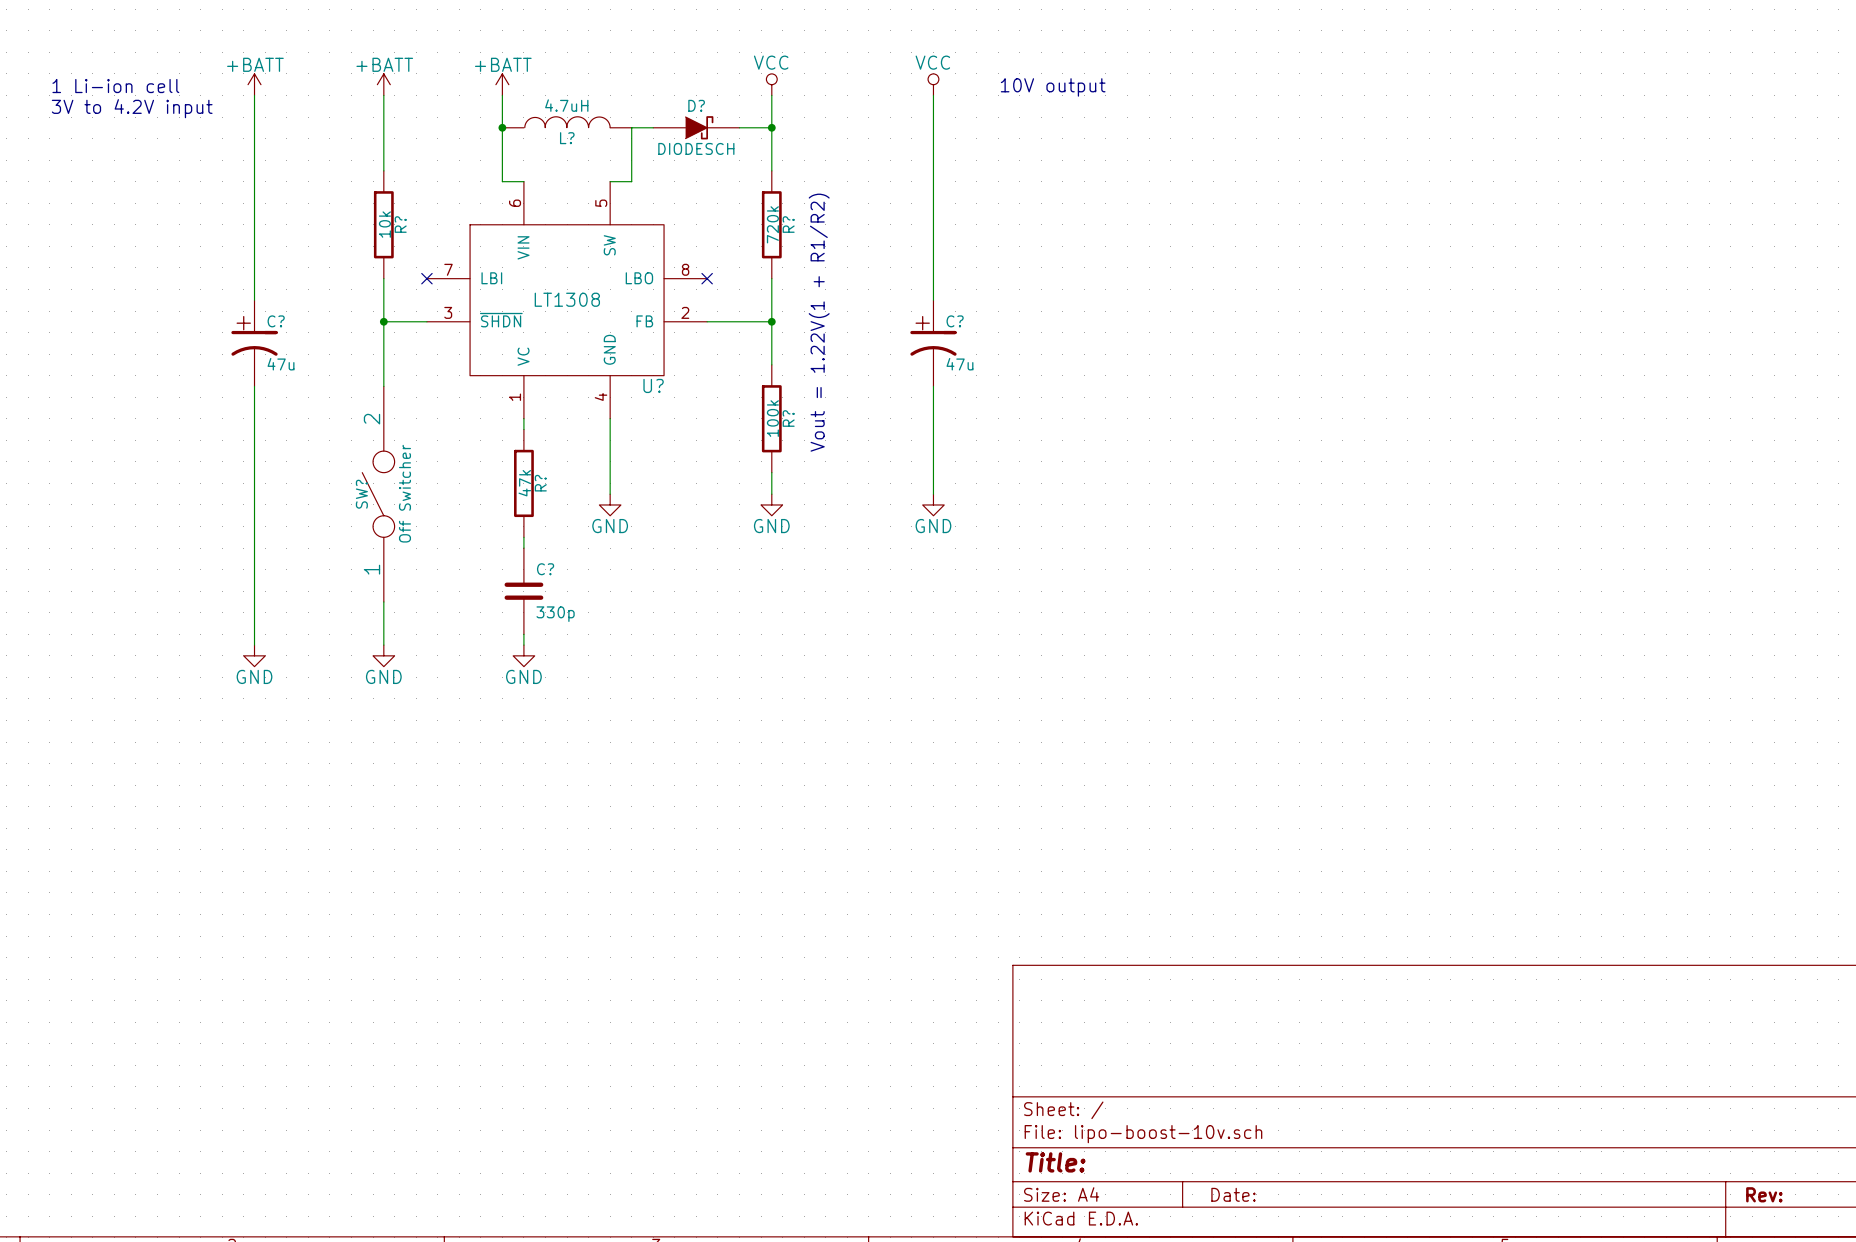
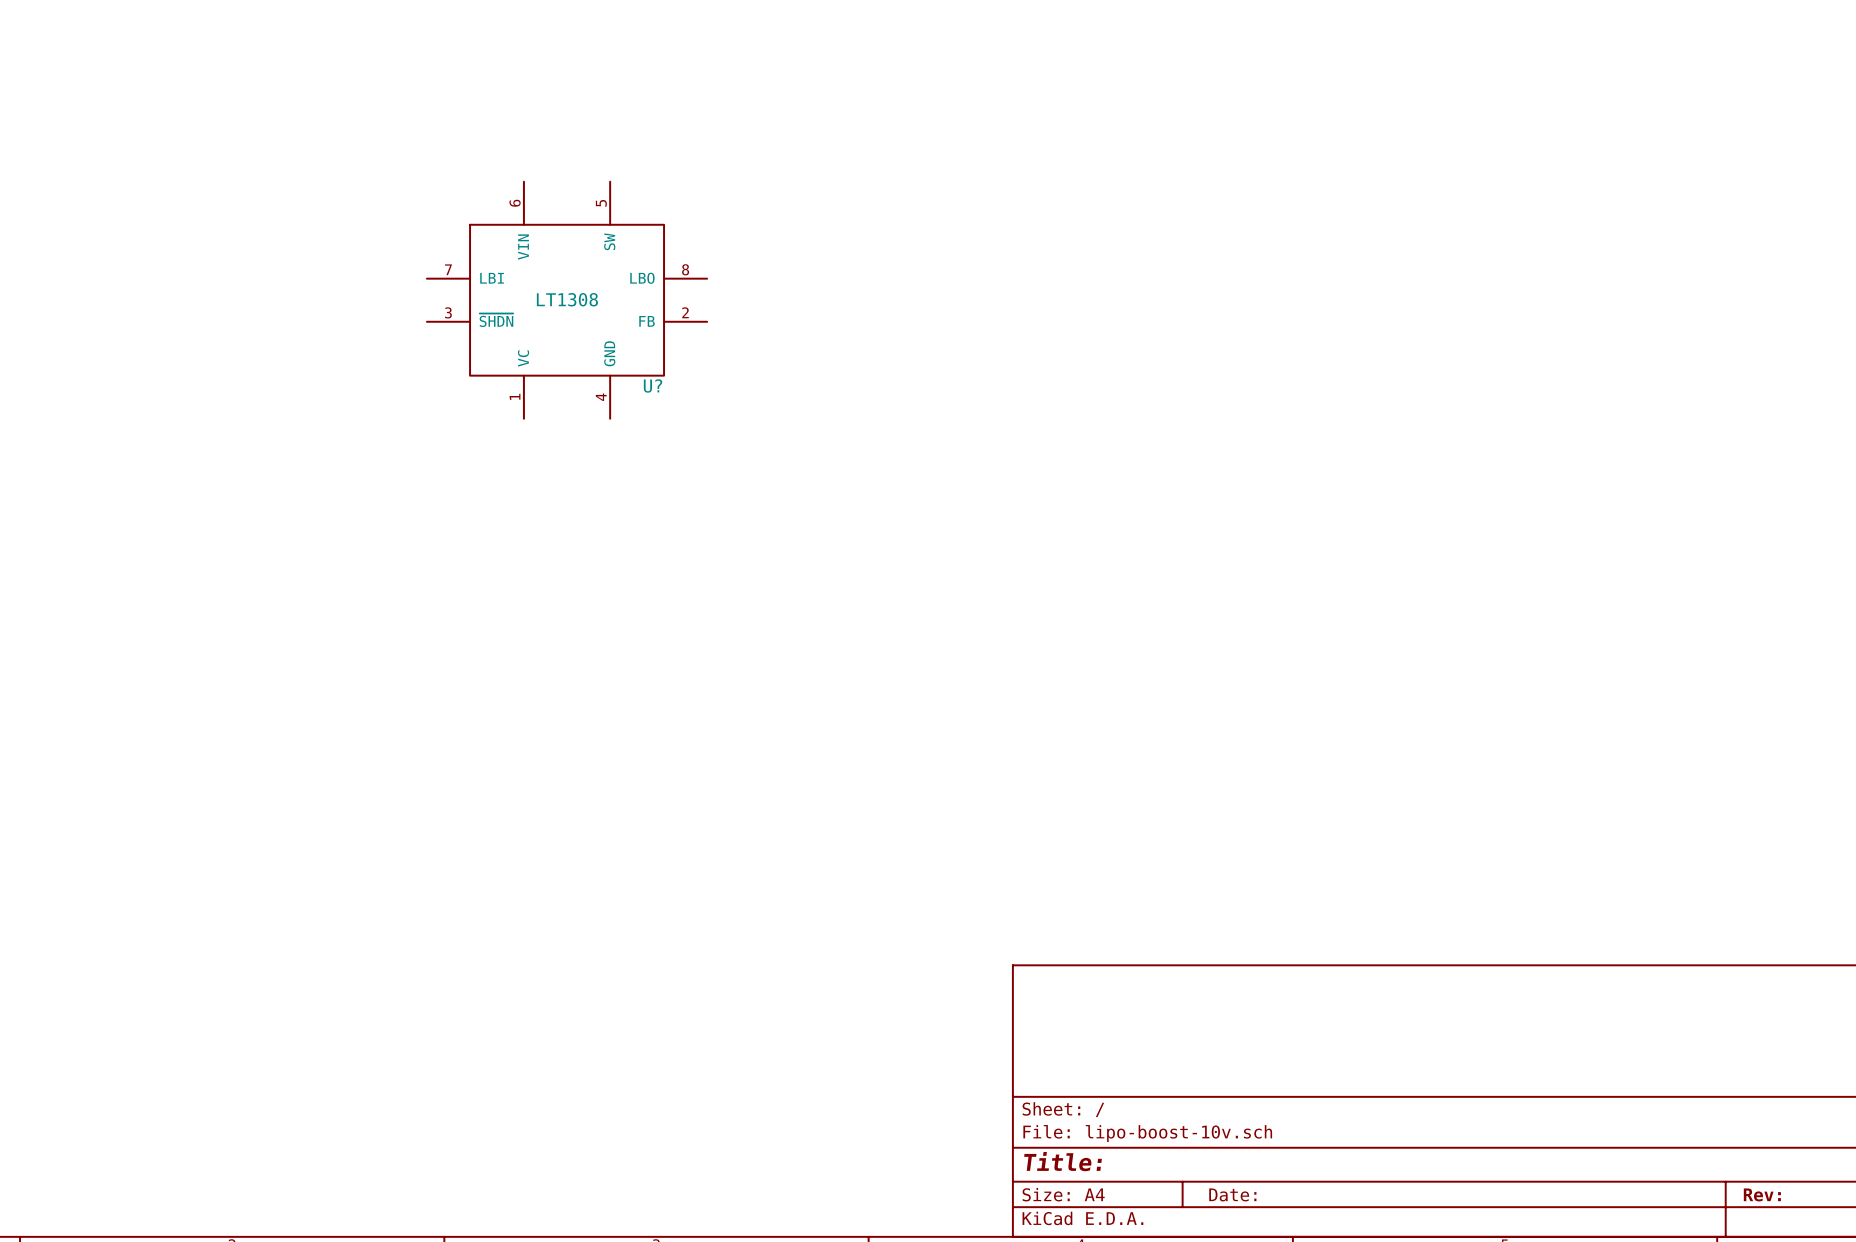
power symbol: +BATT (254, 84) -> none
power symbol: +BATT (383, 84) -> none
power symbol: +BATT (502, 84) -> none
power symbol: VCC (771, 84) -> none
power symbol: VCC (933, 84) -> none
text: 1 Li-ion cell (115, 86) -> none
text: 10V output (1053, 87) -> none
wire: (254, 95) (254, 300) -> none
wire: (383, 95) (383, 170) -> none
wire: (502, 95) (502, 181) (523, 181) -> none
wire: (771, 95) (771, 170) -> none
wire: (933, 95) (933, 300) -> none
text: 3V to 4.2V input (132, 108) -> none
L?: 4.7uH (567, 122) -> none
junction: (502, 127) -> none
wire: (653, 127) (631, 127) (631, 181) (610, 181) -> none
D?: DIODESCH (696, 127) -> none
wire: (739, 127) (771, 127) -> none
junction: (771, 127) -> none
R?: 10k (383, 224) -> none
R?: 720k (771, 224) -> none
wire: (383, 278) (383, 386) -> none
no-connect mark: (426, 278) -> none
no-connect mark: (707, 278) -> none
wire: (771, 278) (771, 364) -> none
wire: (383, 321) (426, 321) -> none
junction: (383, 321) -> none
wire: (707, 321) (771, 321) -> none
junction: (771, 321) -> none
text: Vout = 1.22V(1 + R1/R2) (819, 322) -> none
C?: 47u (254, 343) -> none
C?: 47u (933, 343) -> none
wire: (254, 386) (254, 645) -> none
wire: (933, 386) (933, 494) -> none
wire: (523, 418) (523, 429) -> none
wire: (610, 418) (610, 494) -> none
R?: 100k (771, 418) -> none
wire: (771, 472) (771, 494) -> none
R?: 47k (523, 483) -> none
SW?: Off Switcher (378, 494) -> none
power symbol: GND (610, 504) -> none
power symbol: GND (771, 504) -> none
power symbol: GND (933, 504) -> none
wire: (523, 537) (523, 548) -> none
C?: 330p (523, 591) -> none
wire: (383, 601) (383, 645) -> none
wire: (523, 634) (523, 645) -> none
power symbol: GND (254, 655) -> none
power symbol: GND (383, 655) -> none
power symbol: GND (523, 655) -> none

